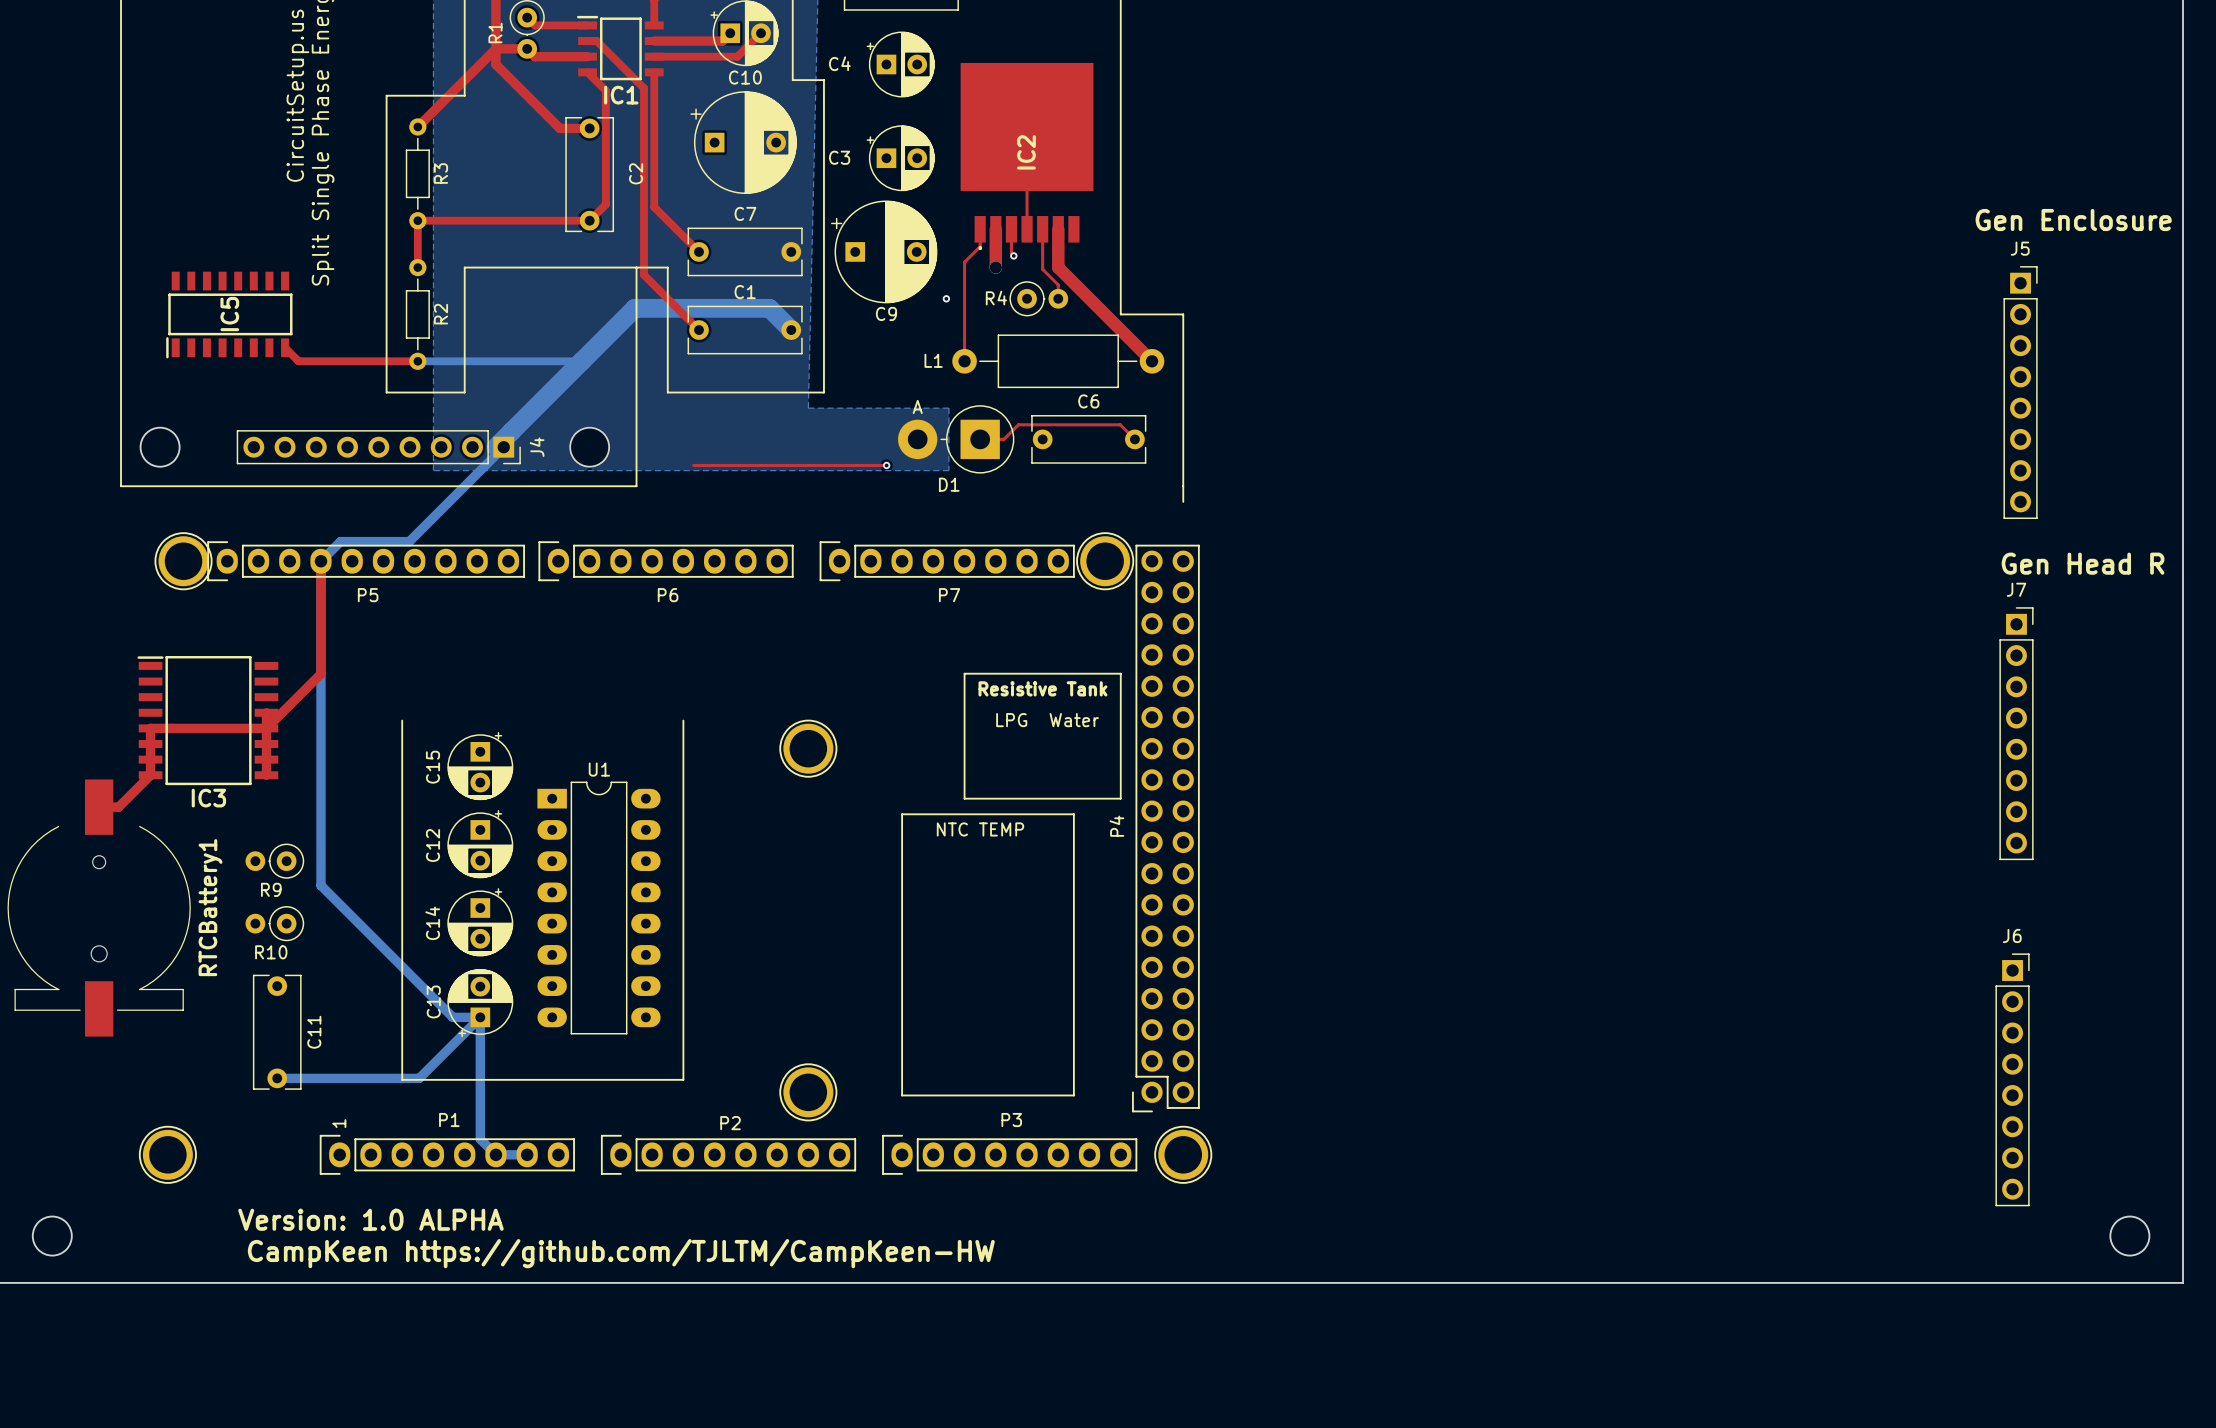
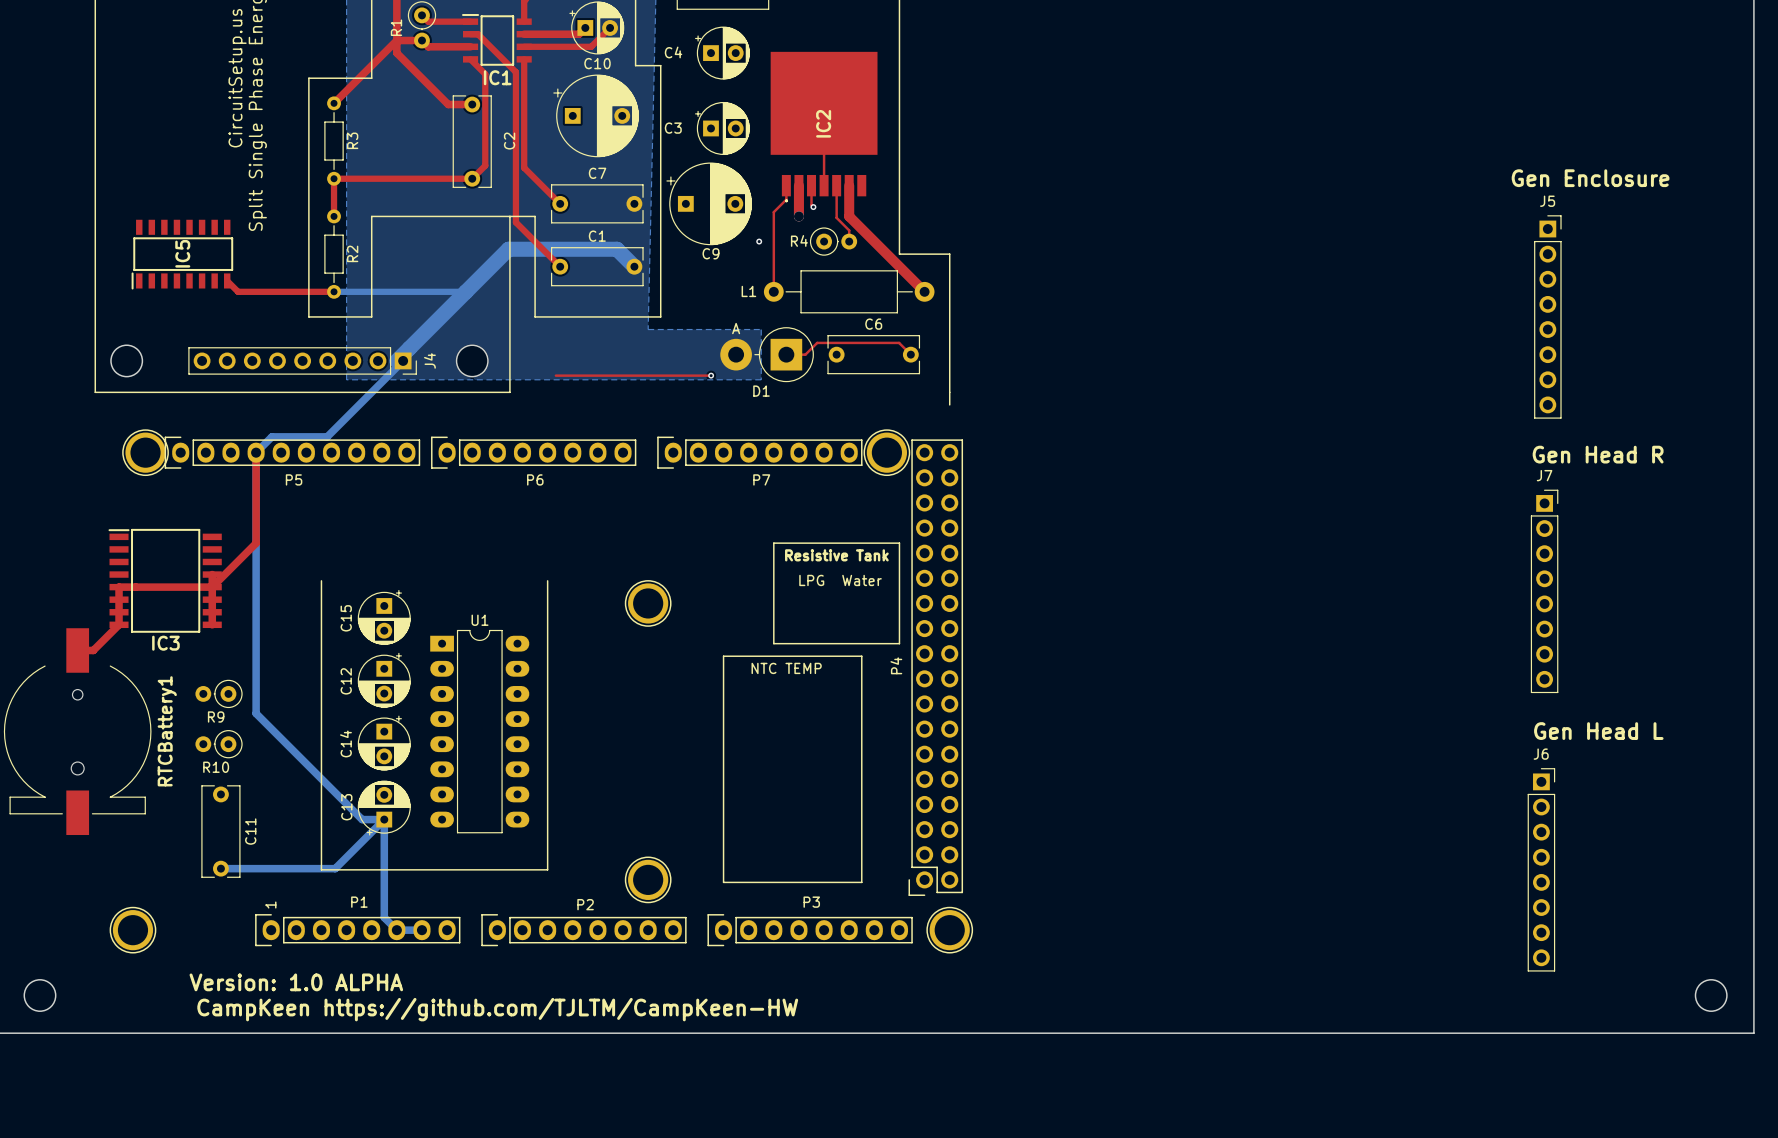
text position: Gen Enclosure (2073, 220) -> Gen Enclosure (1590, 178)
J5 position: (2020, 392) -> (1547, 316)
text position: Gen Head R (2083, 563) -> Gen Head R (1598, 454)
J7 position: (2016, 733) -> (1544, 591)
text: none -> Gen Head L (1598, 731)
J6 position: (2012, 1079) -> (1541, 869)

